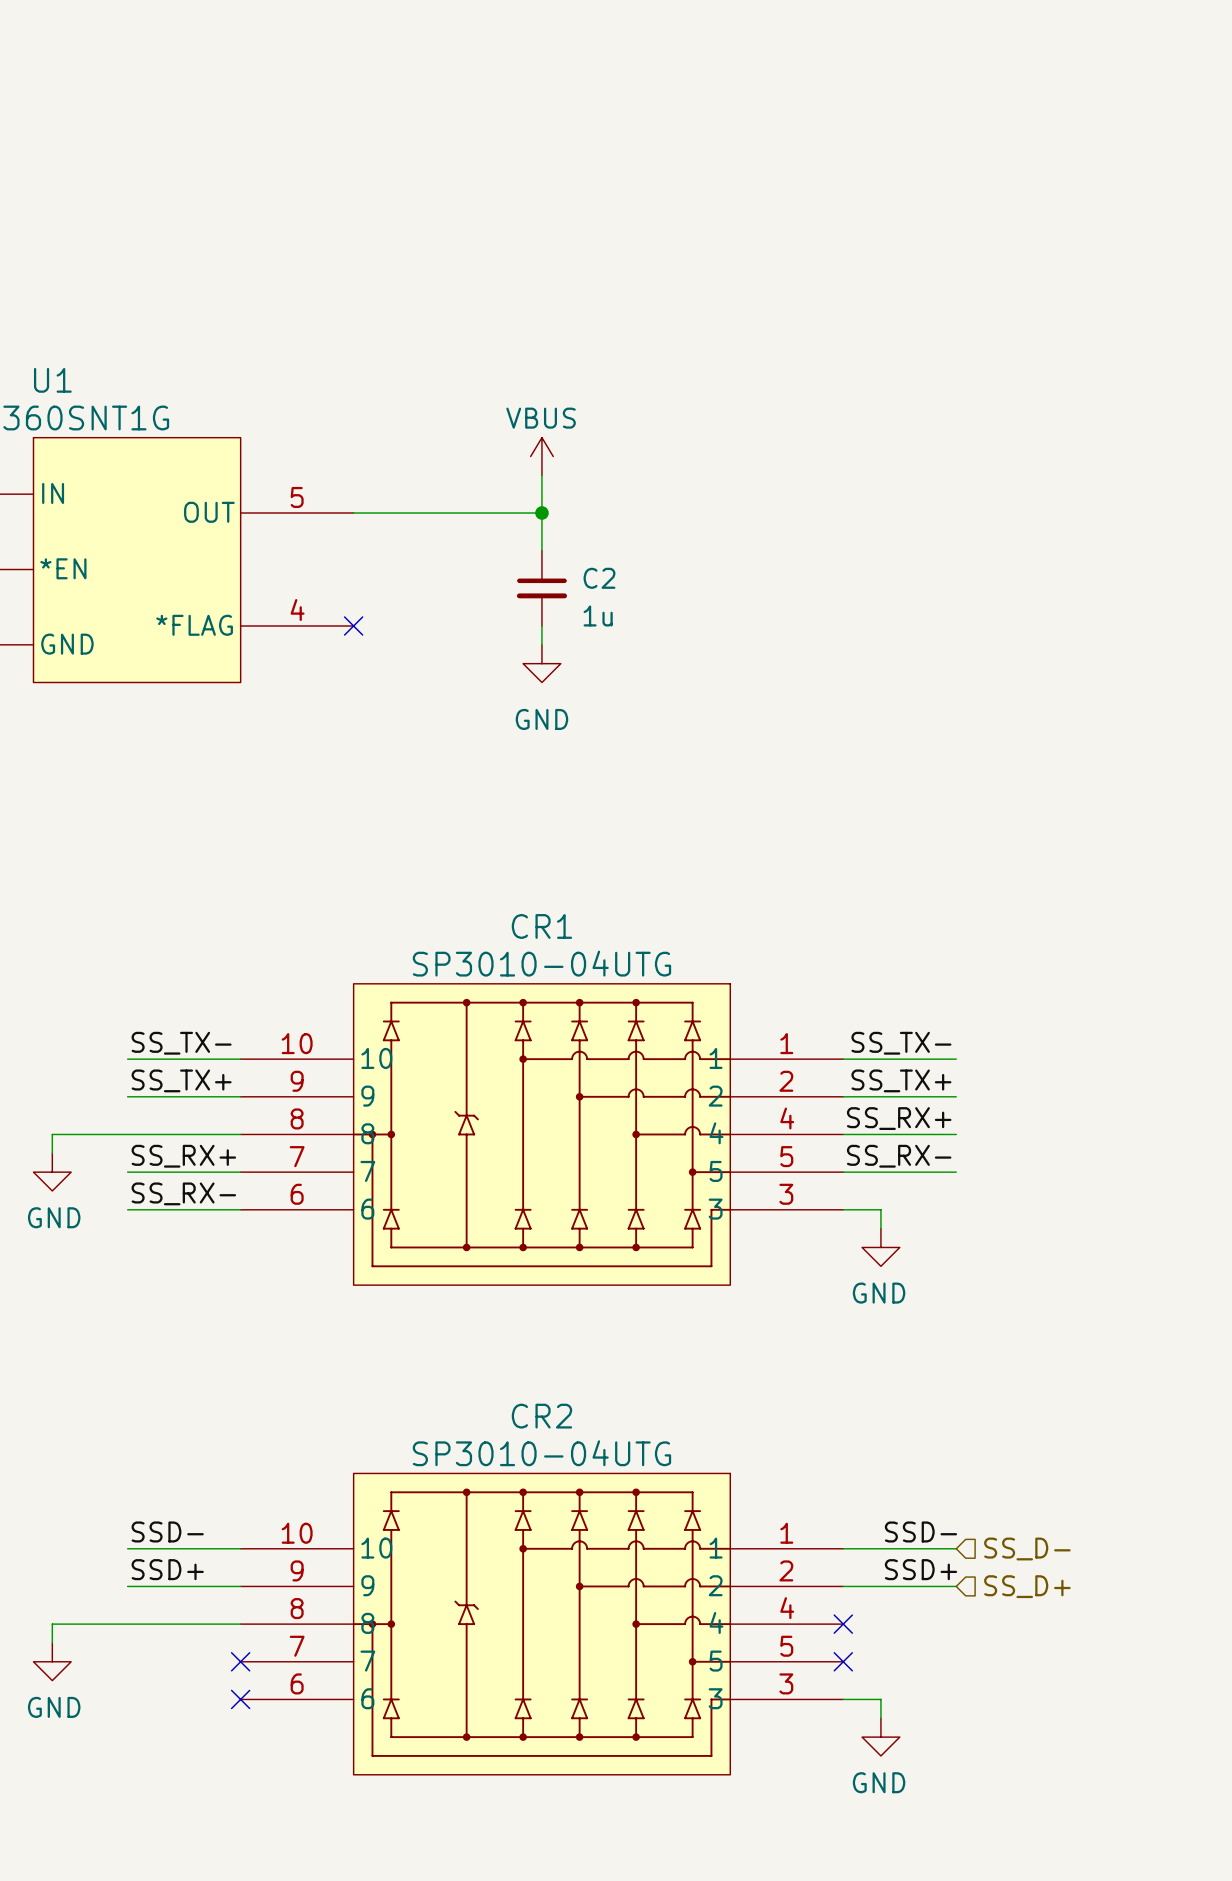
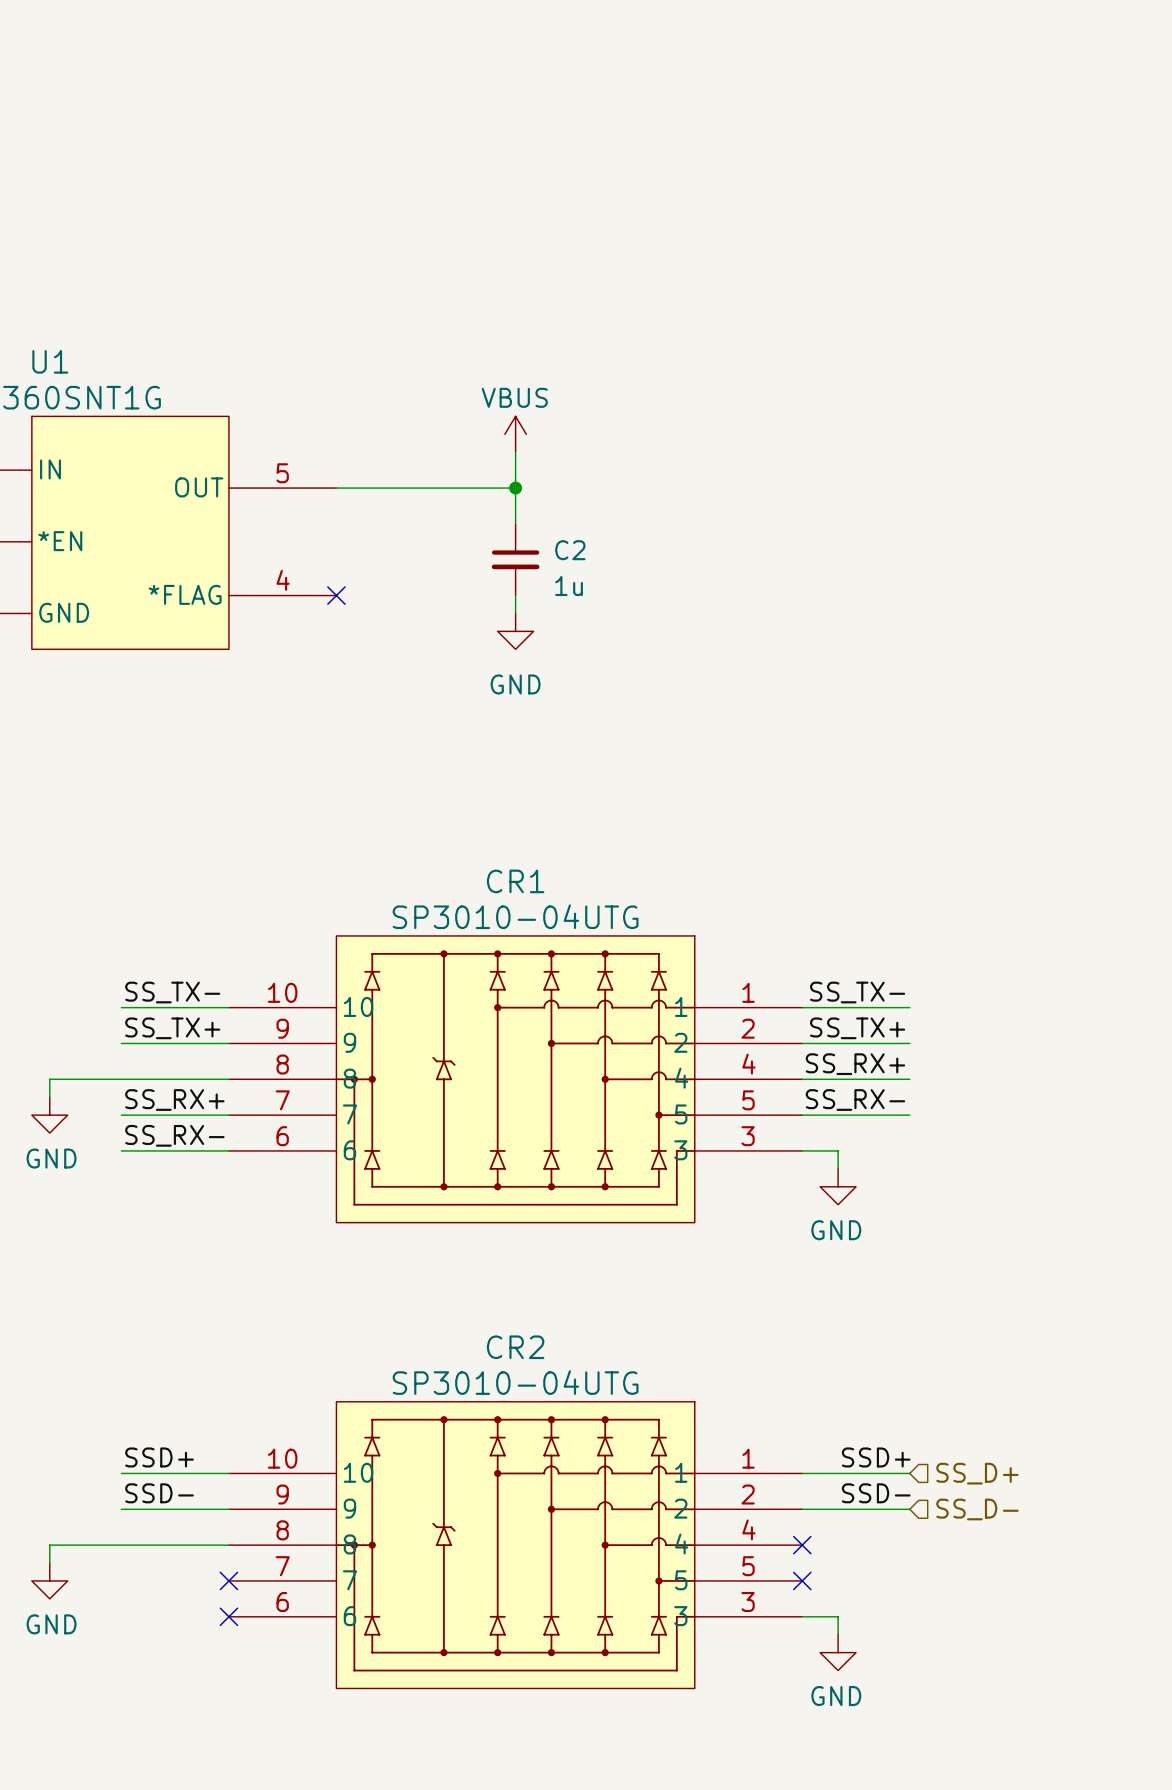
label: SSD- (167, 1531) -> SSD+ (159, 1457)
label: SSD- (920, 1531) -> SSD+ (876, 1457)
hierarchical label: SS_D- (1027, 1548) -> SS_D+ (977, 1473)
label: SSD+ (167, 1569) -> SSD- (159, 1493)
label: SSD+ (920, 1569) -> SSD- (876, 1493)
hierarchical label: SS_D+ (1027, 1586) -> SS_D- (977, 1509)

